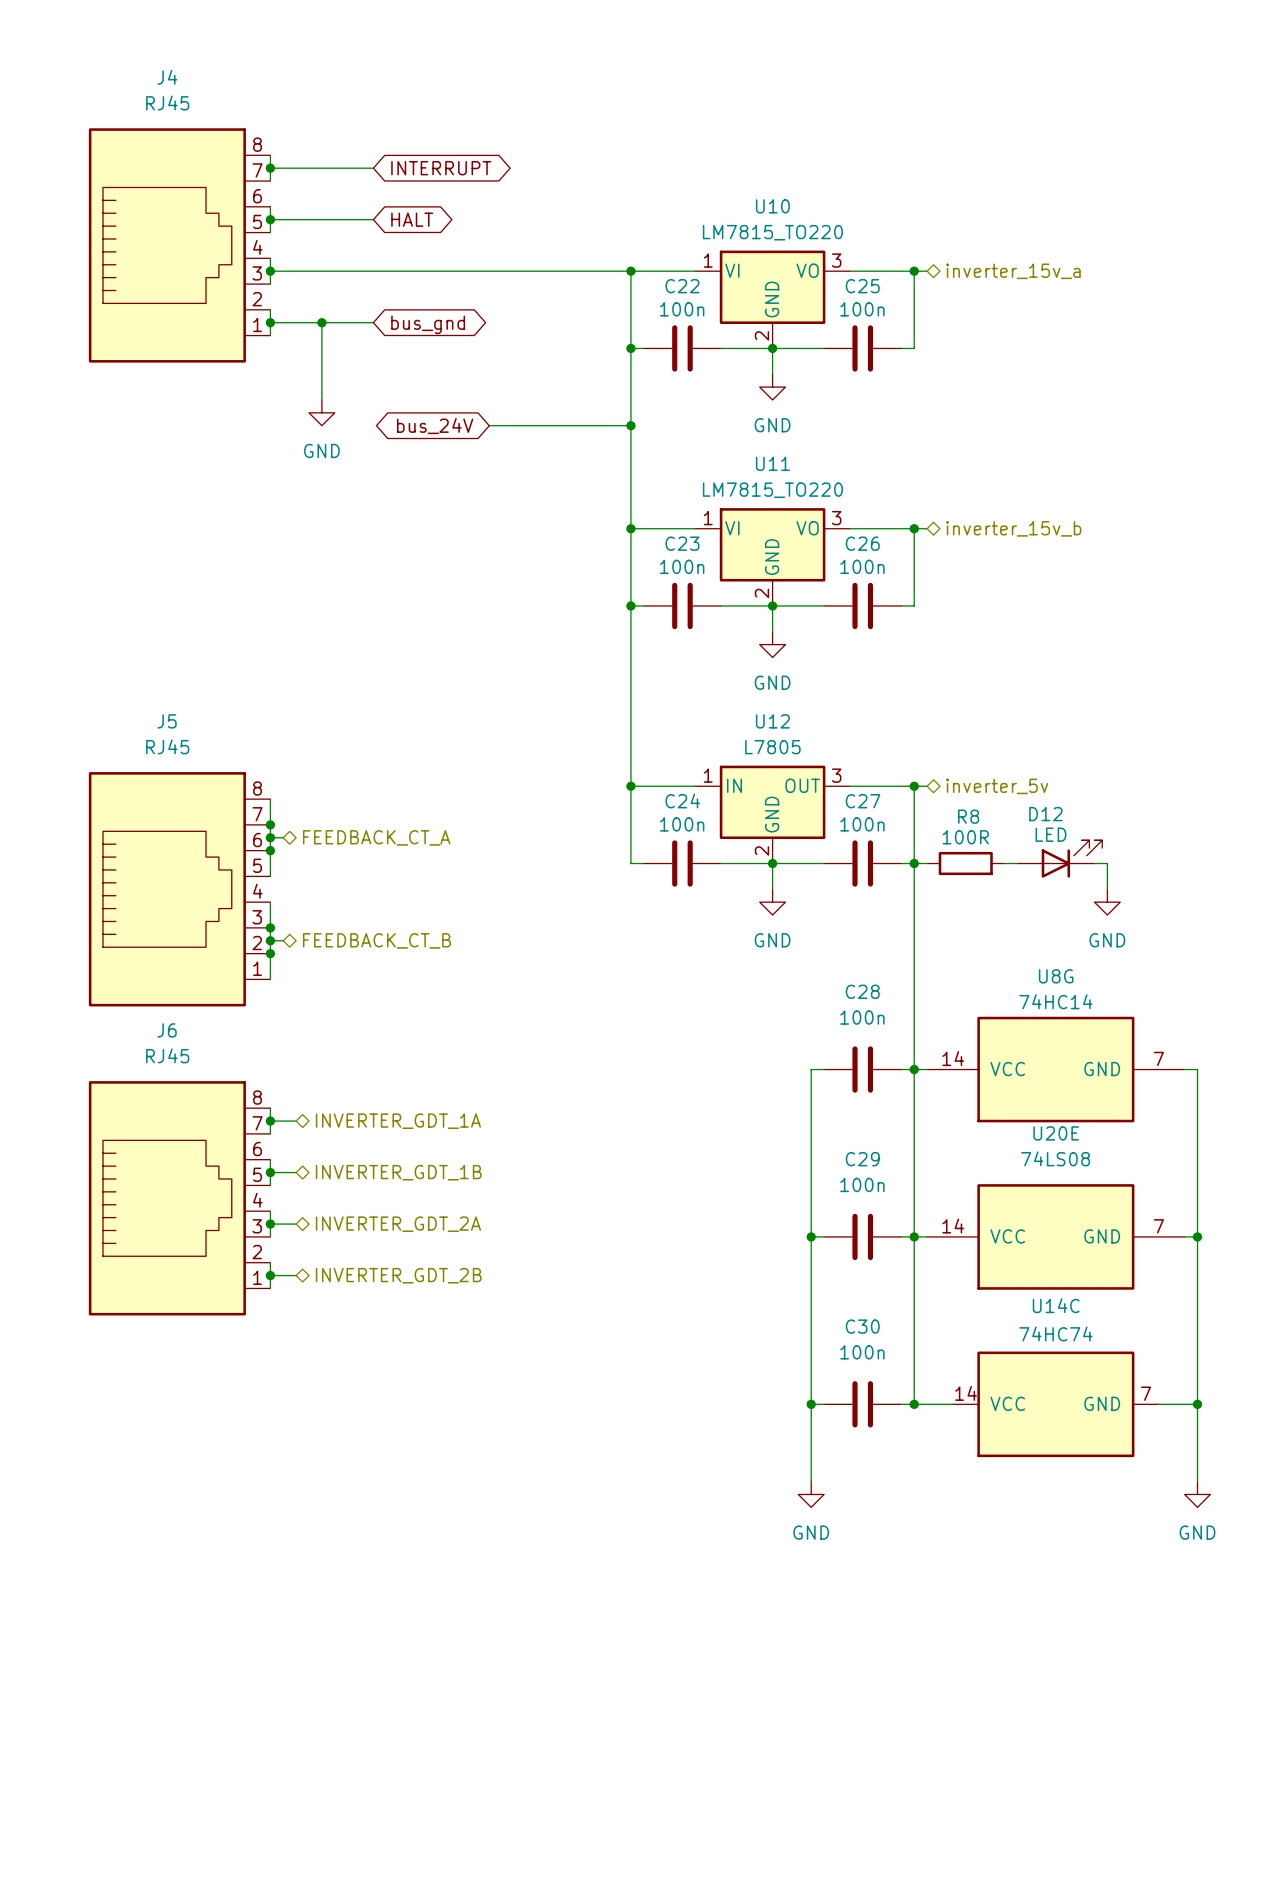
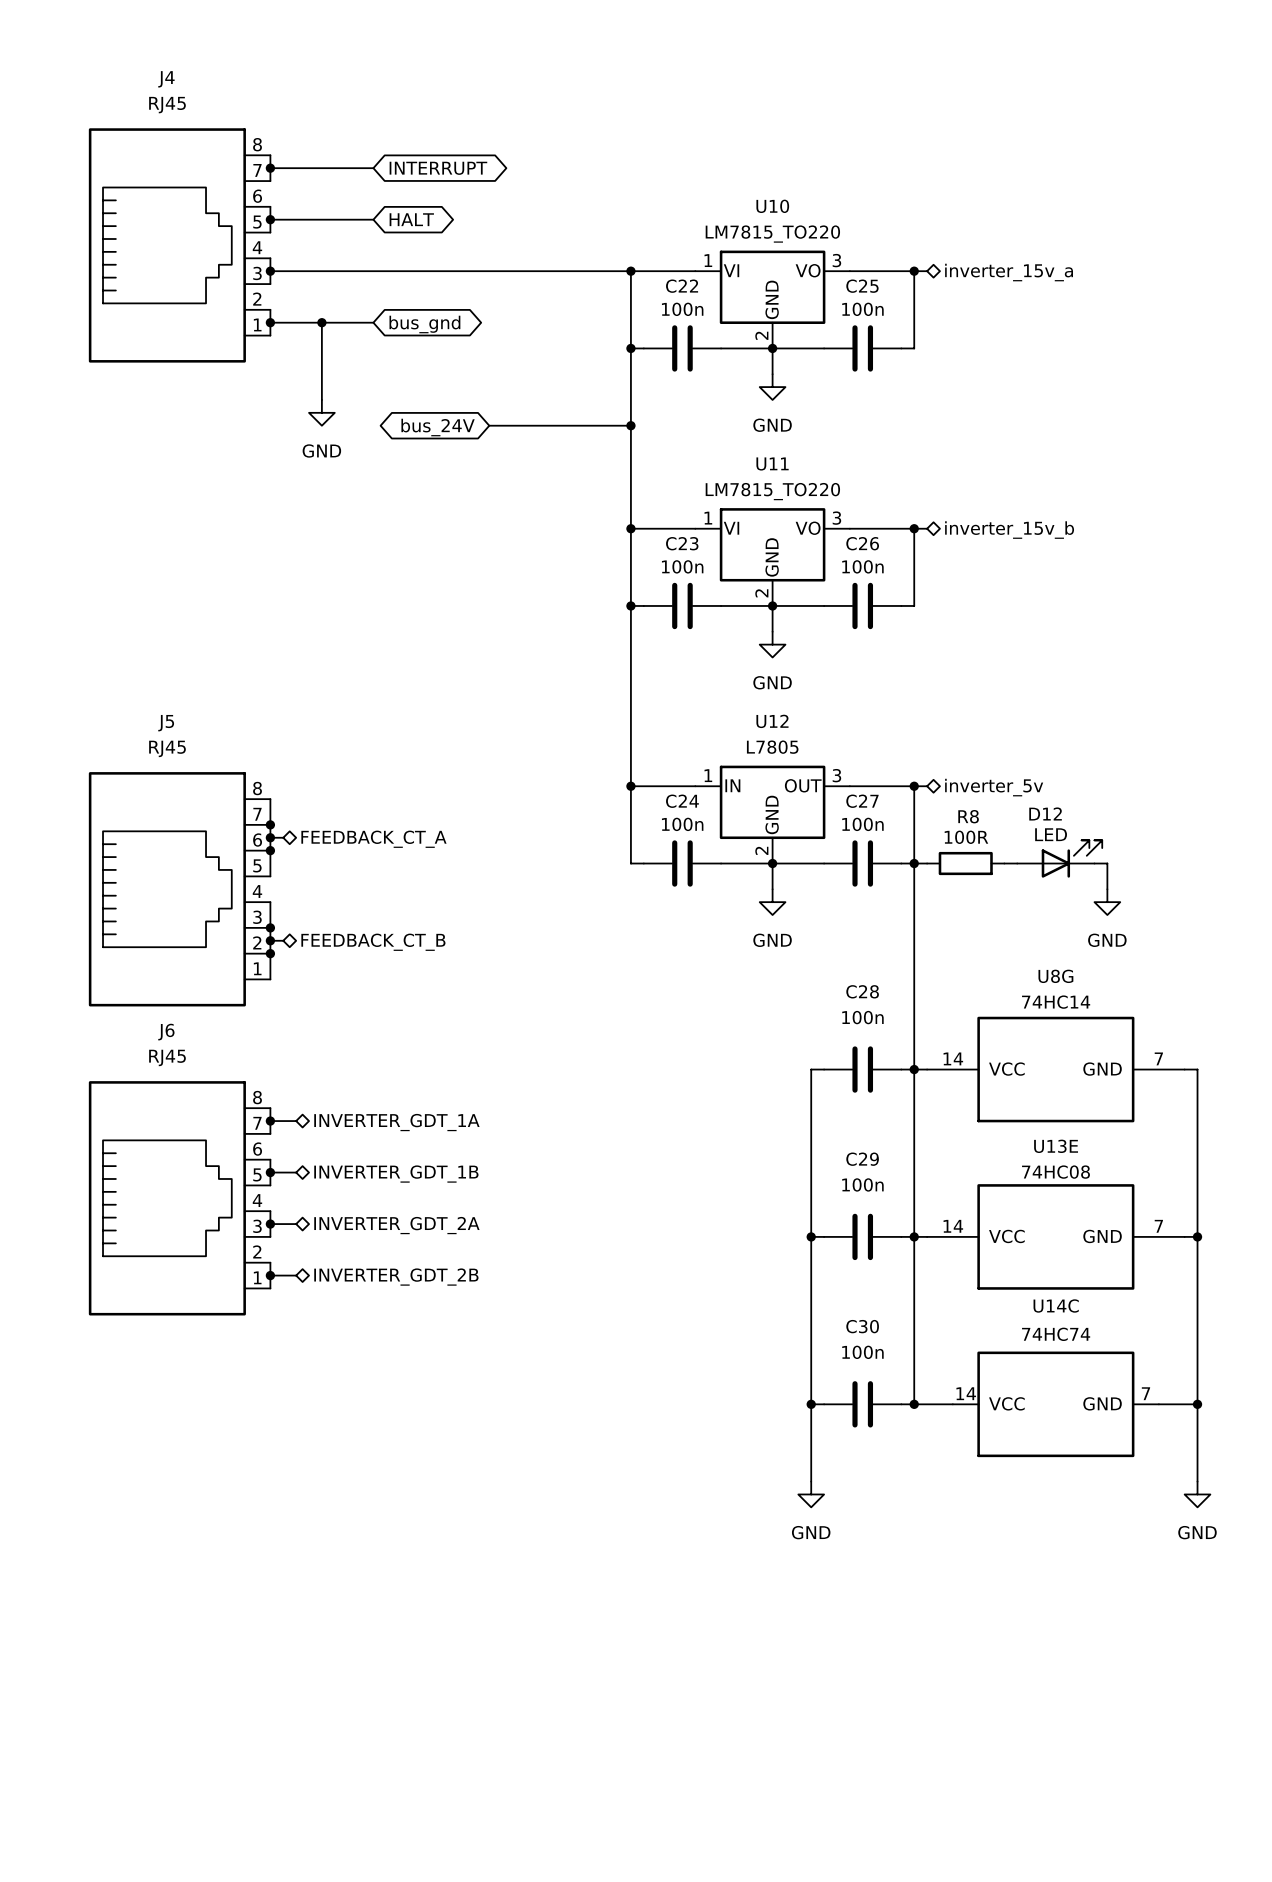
U20E name: U20E (1056, 1133) -> U13E (1056, 1146)
U20E value: 74LS08 (1055, 1158) -> 74HC08 (1055, 1172)

